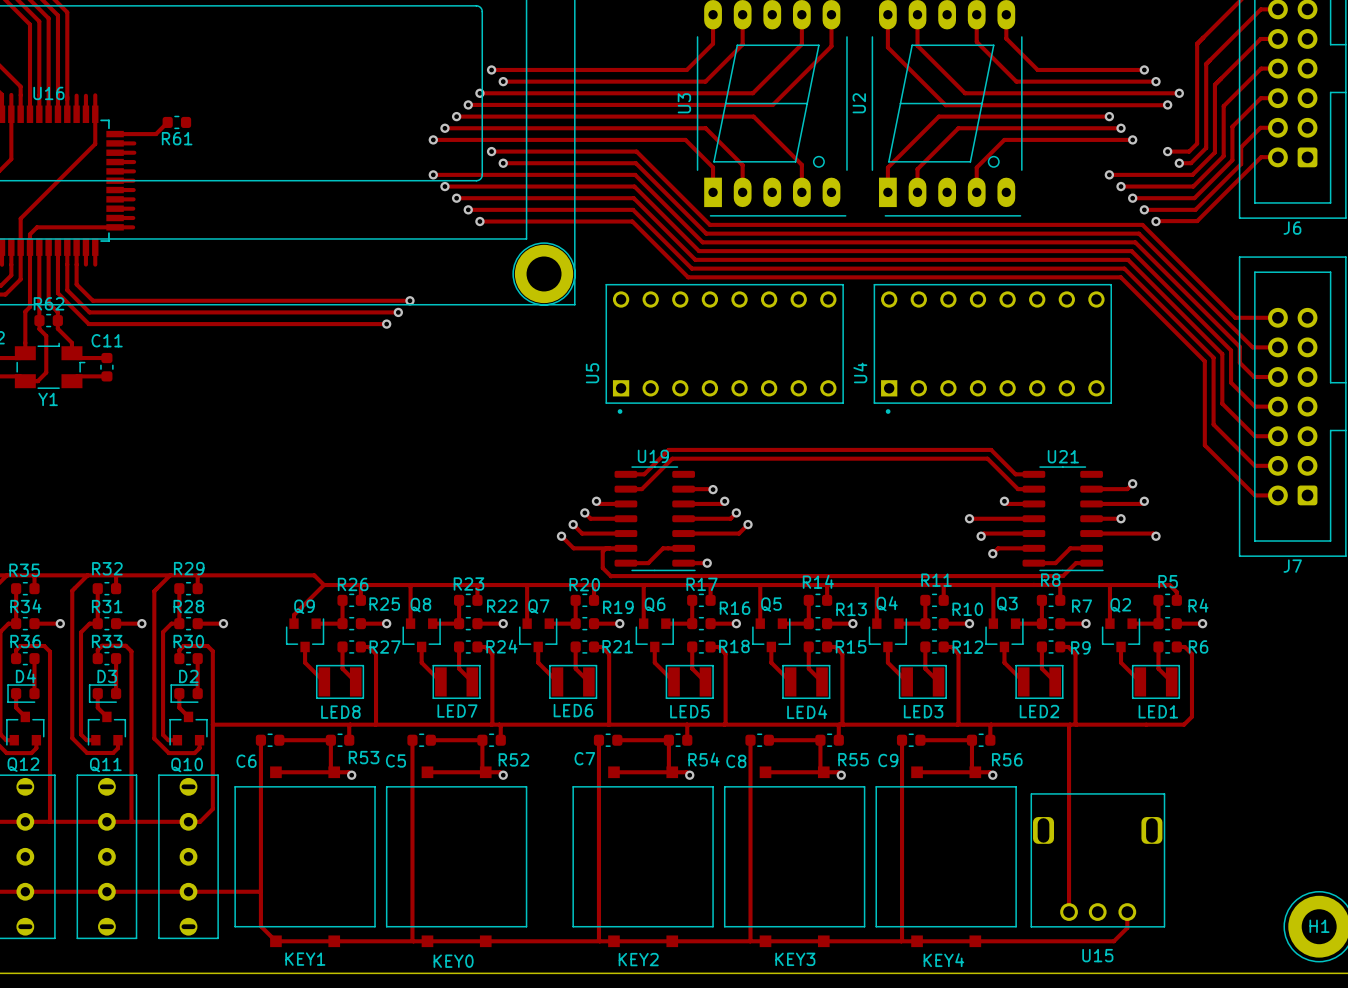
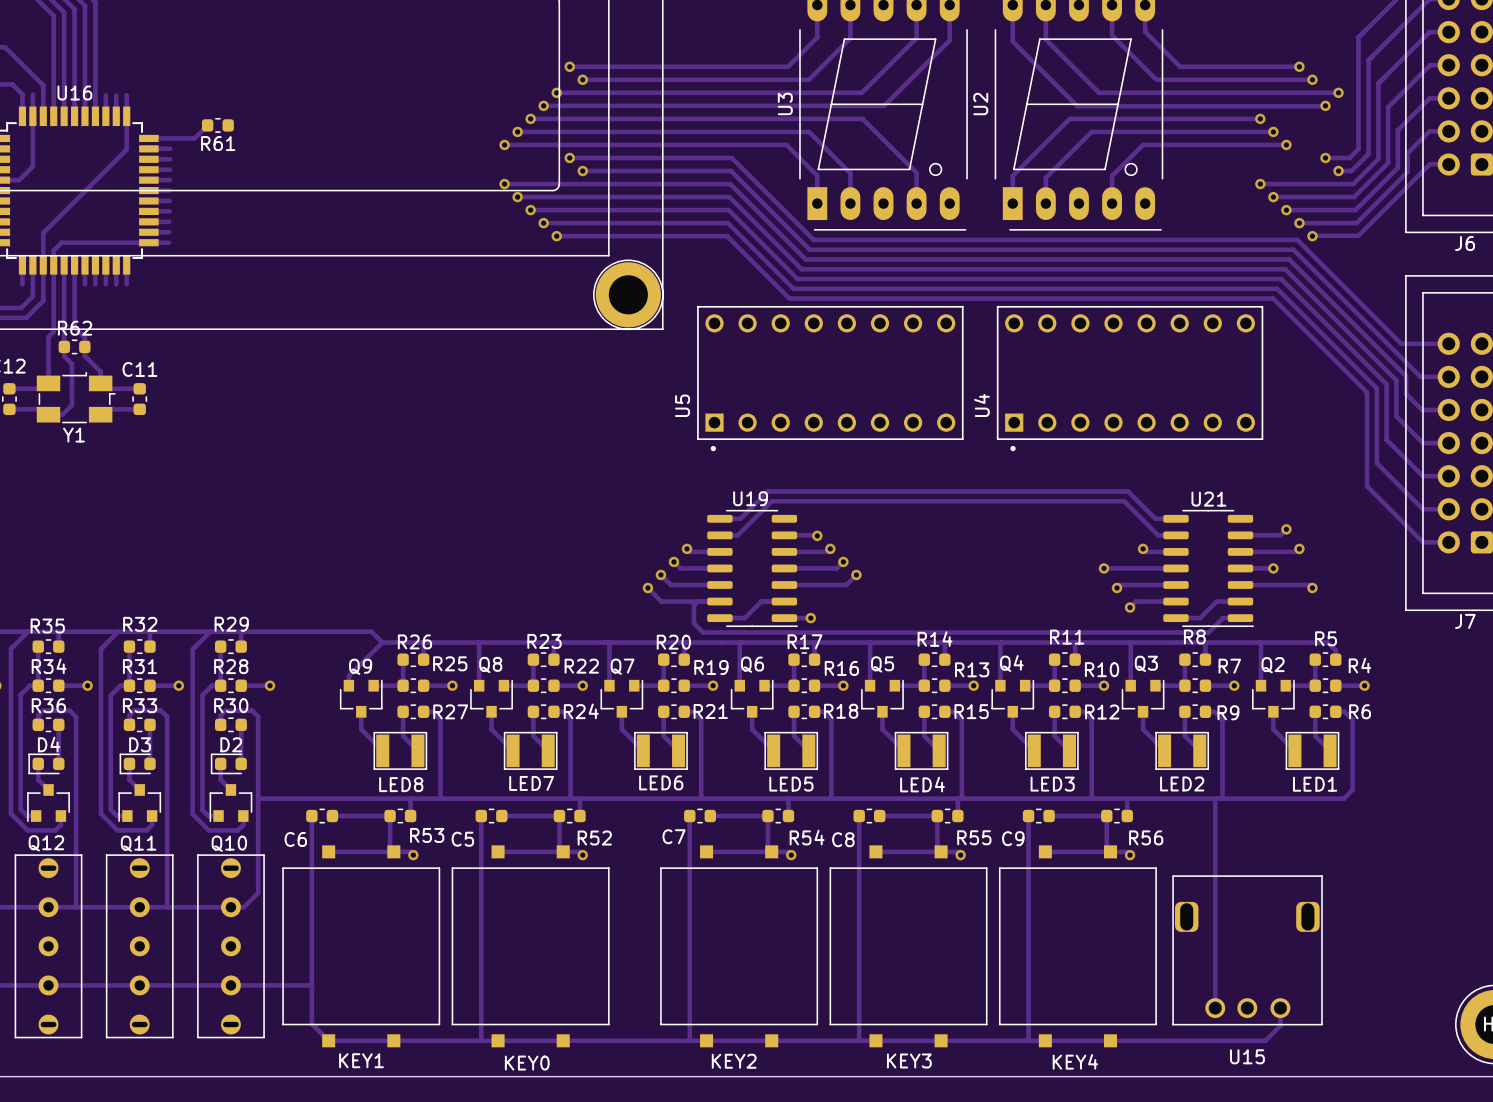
track: (57, 264) (57, 293) (88, 324) (386, 324) -> none
track: (67, 264) (67, 290) (89, 312) (398, 312) -> none
track: (76, 264) (76, 284) (92, 300) (409, 300) -> none
via: (409, 300) -> none
via: (398, 312) -> none
via: (386, 324) -> none

